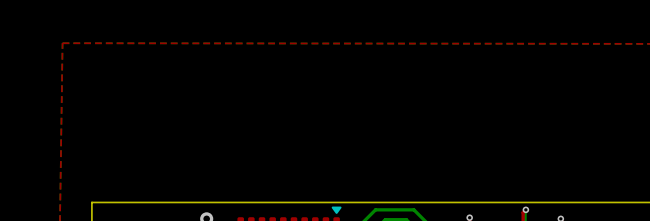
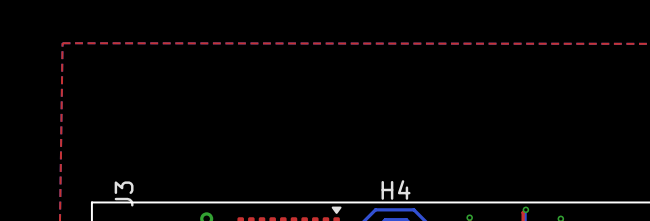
H4 name: none -> H4 (396, 189)
J3 name: none -> J3 (124, 193)

